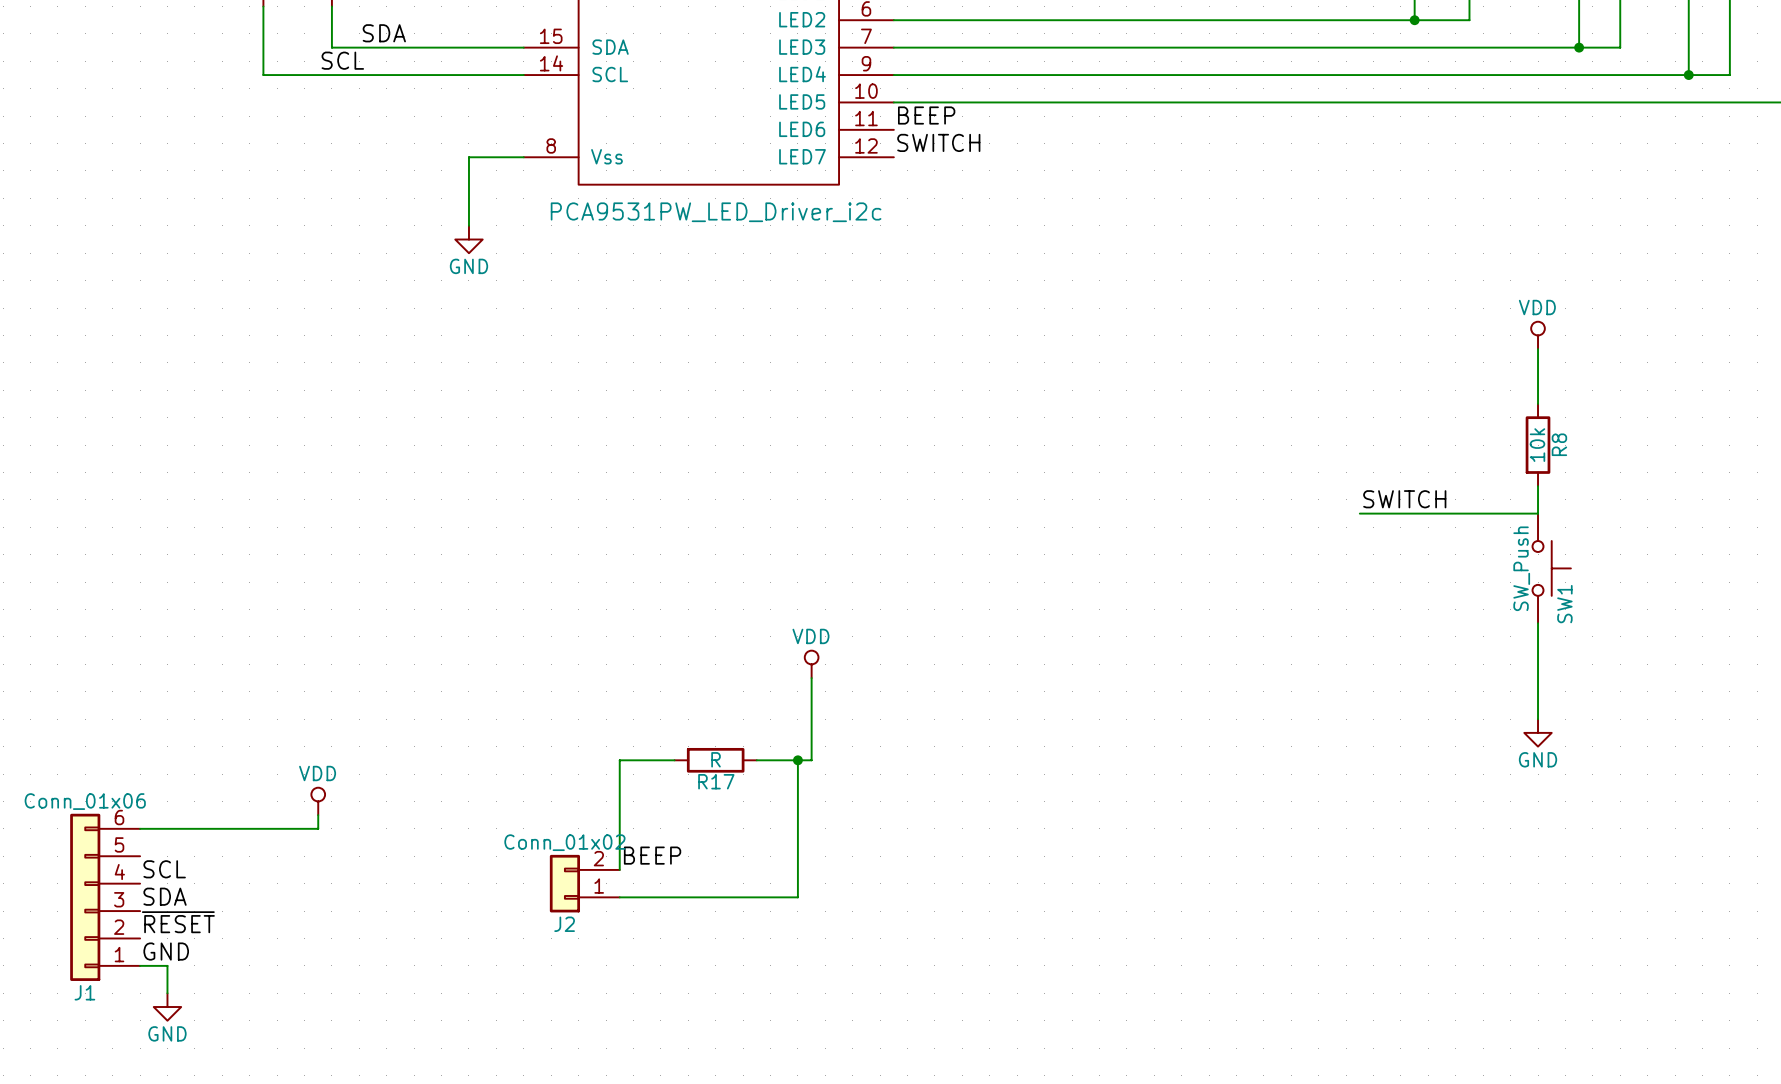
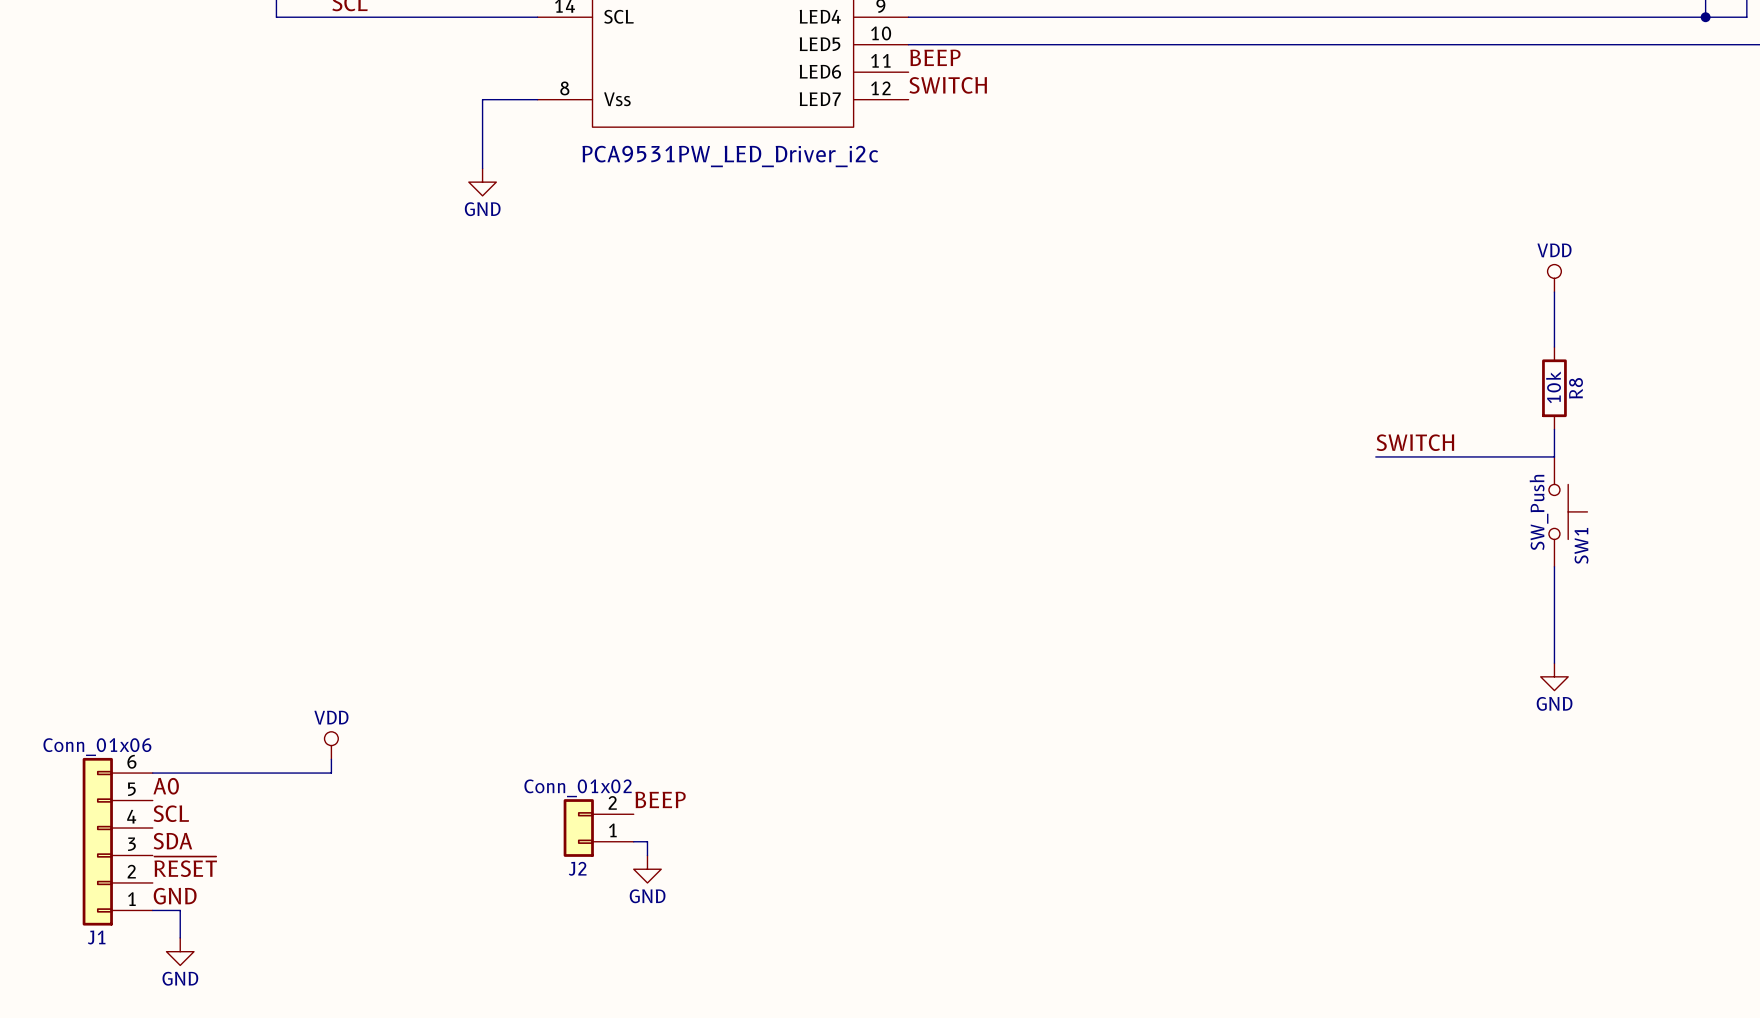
power symbol: VDD (811, 664) -> none
wire: (811, 678) (811, 760) (756, 760) -> none
wire: (674, 760) (619, 760) (619, 869) -> none
R17: R (715, 760) -> none
wire: (797, 760) (797, 897) (633, 897) -> (647, 855) (647, 841)
junction: (797, 760) -> none
label: none -> A0 (166, 786)
power symbol: none -> GND (647, 869)

